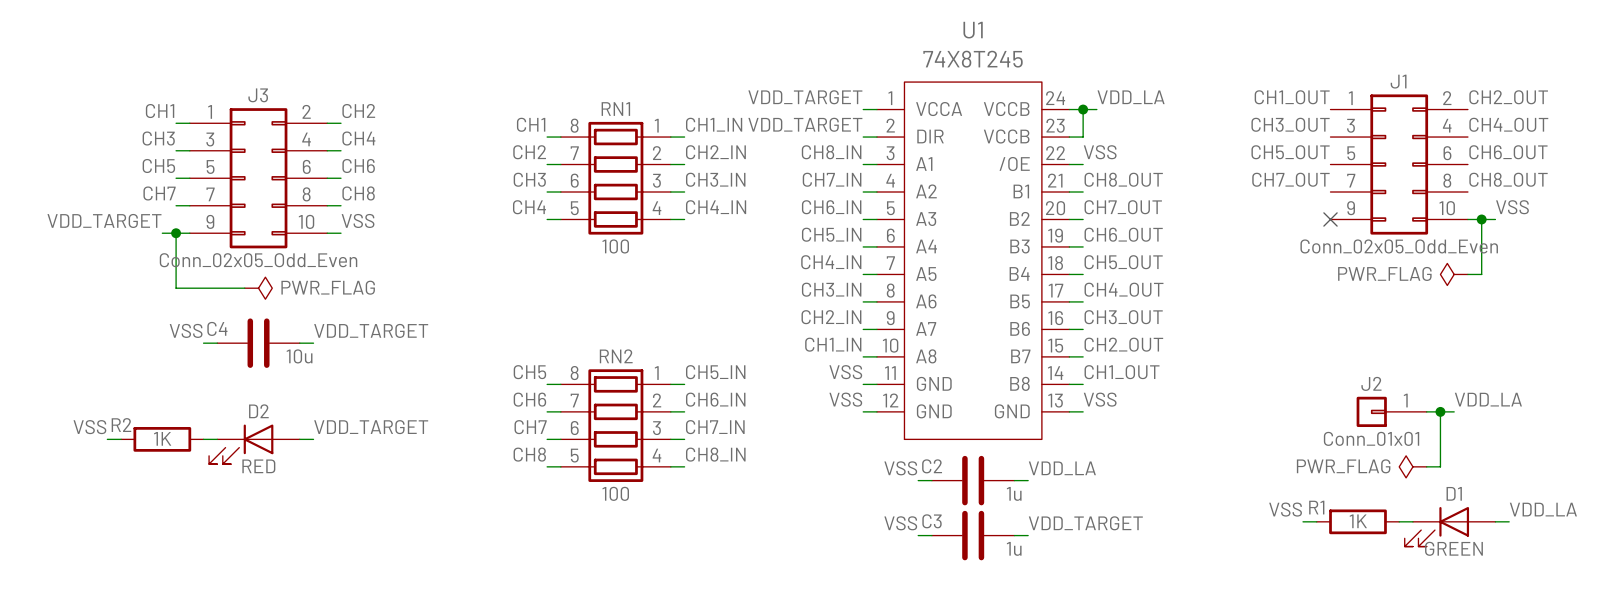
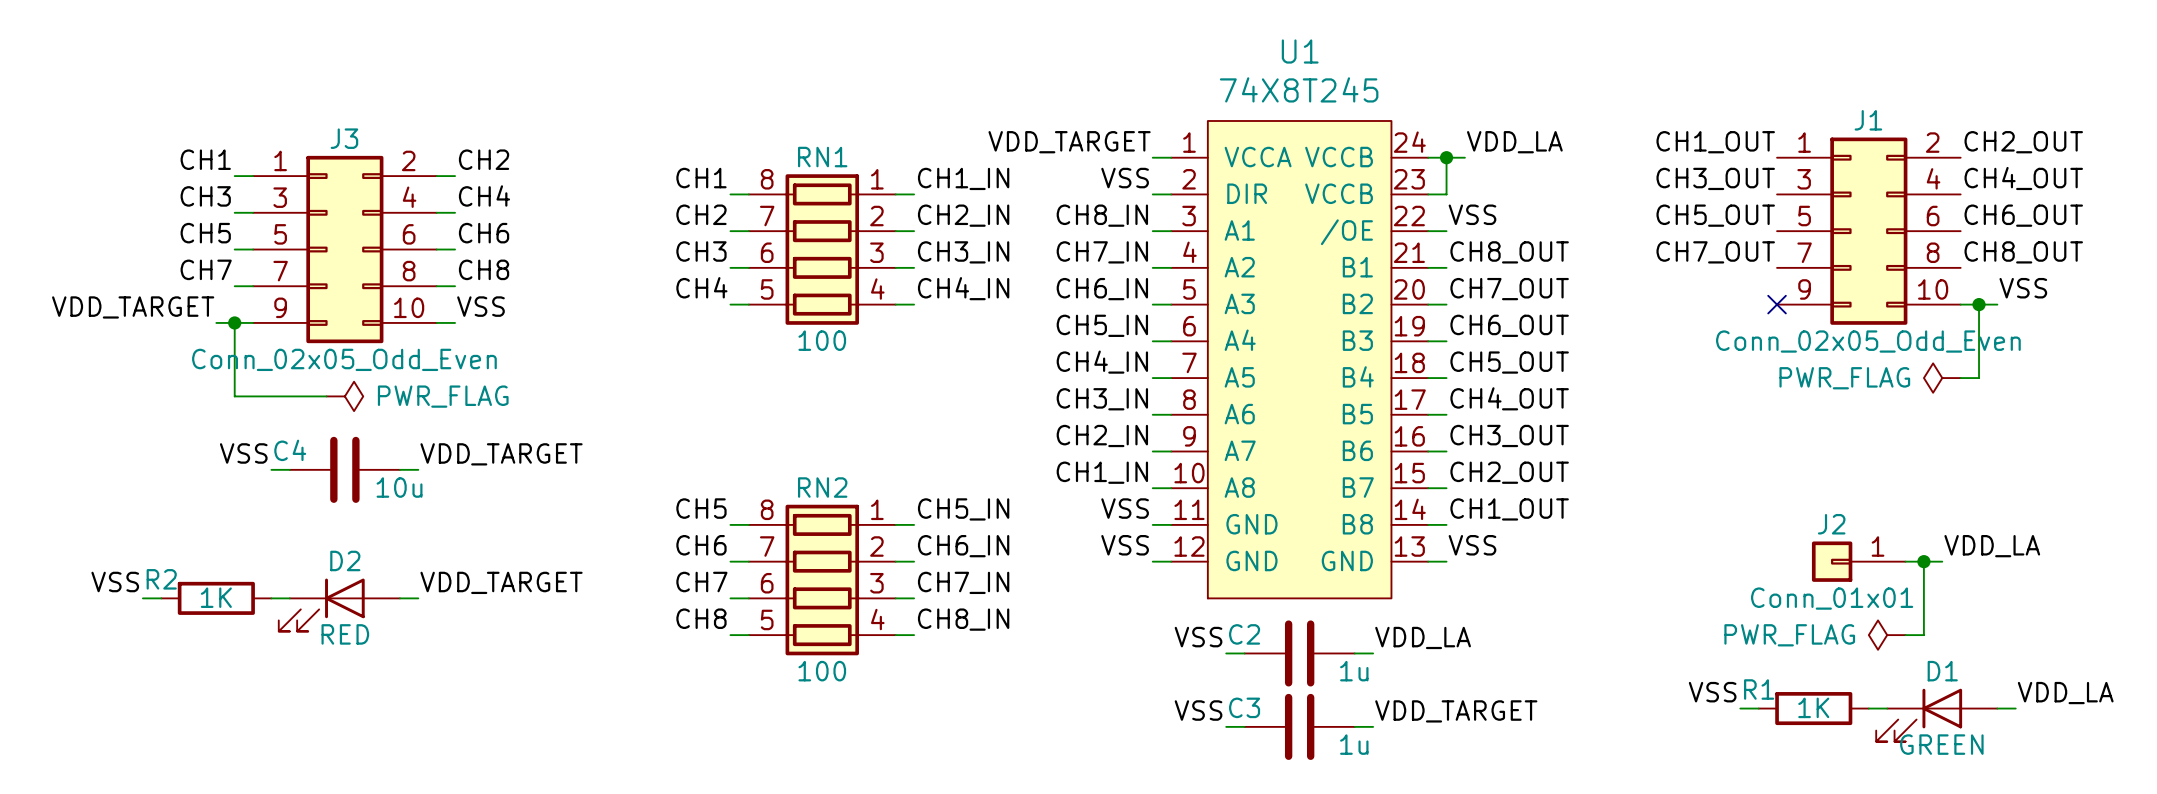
label: VDD_TARGET (805, 124) -> VSS (1125, 178)

